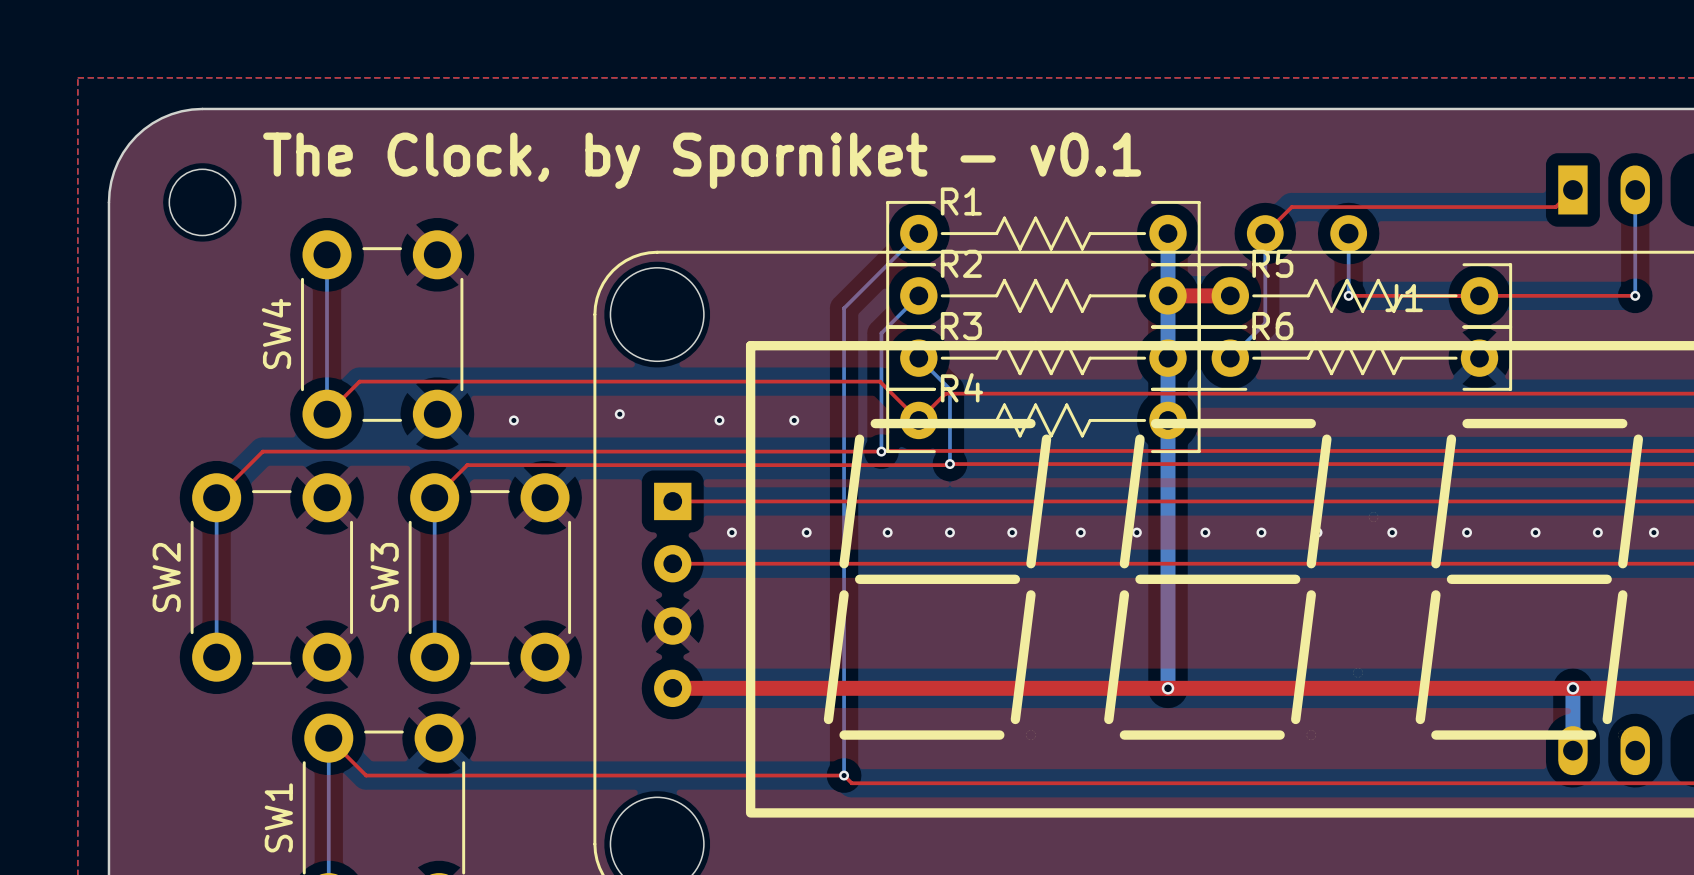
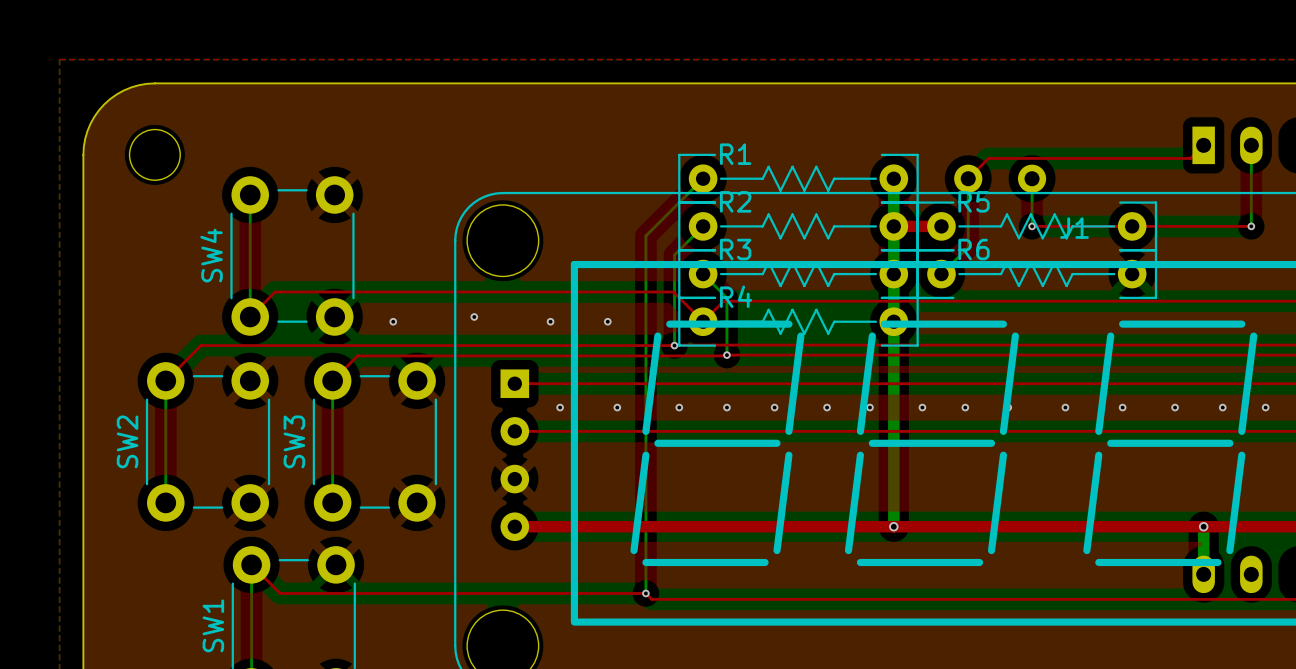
text: The Clock, by Sporniket - v0.1 (702, 160) -> none

